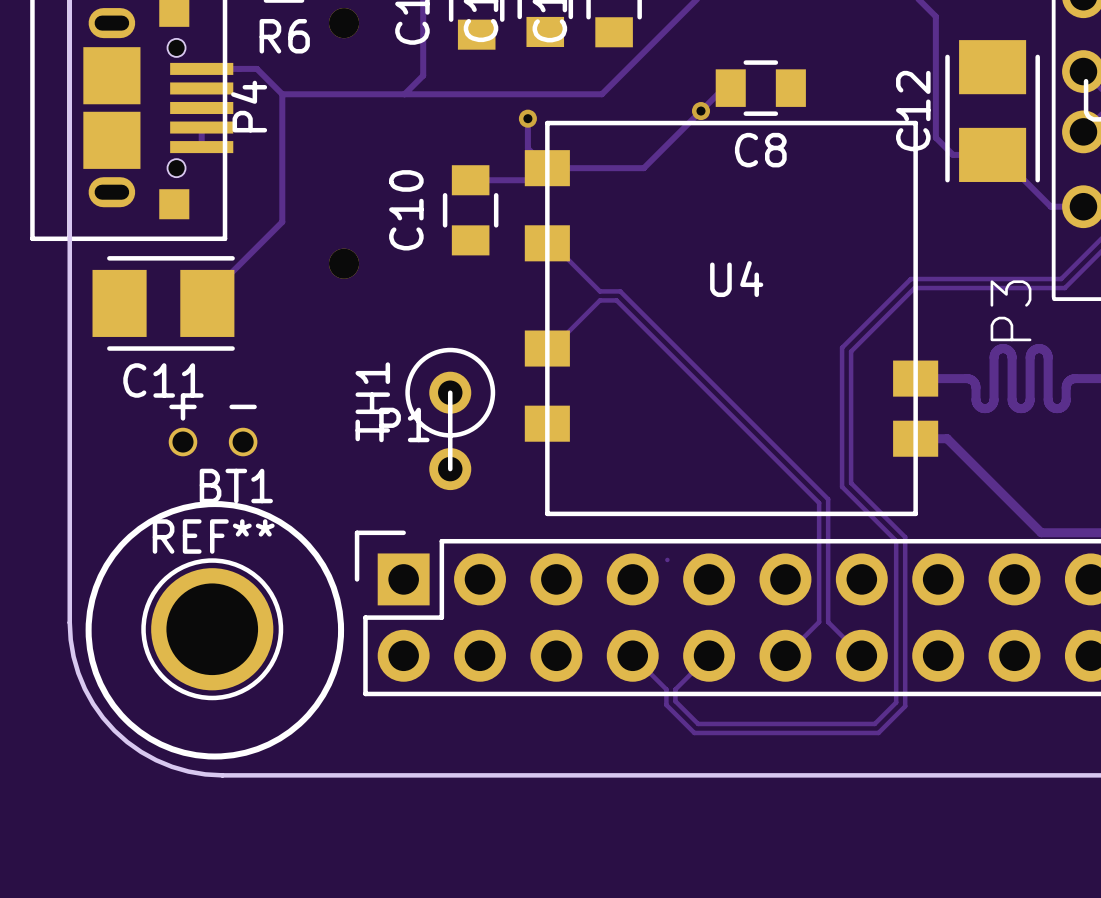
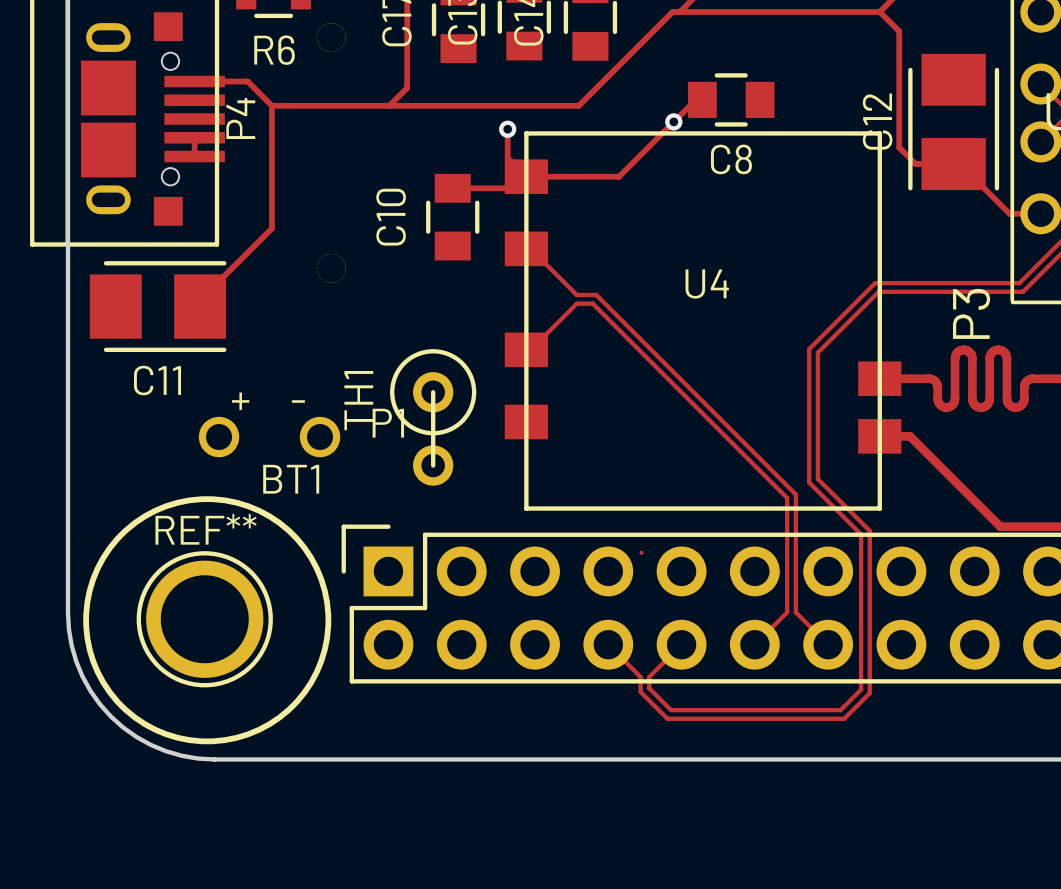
BT1 footprint: [168, 427, 258, 457] -> [198, 416, 341, 458]

